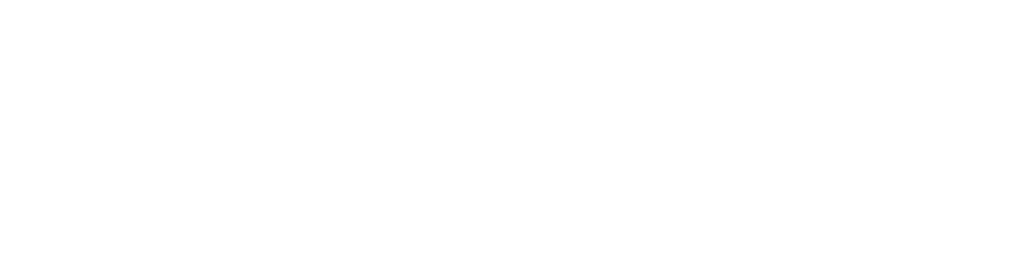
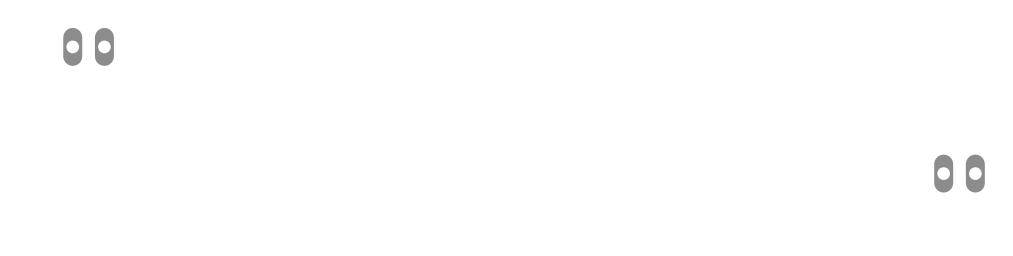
part: none -> (88, 46)
part: none -> (959, 173)

